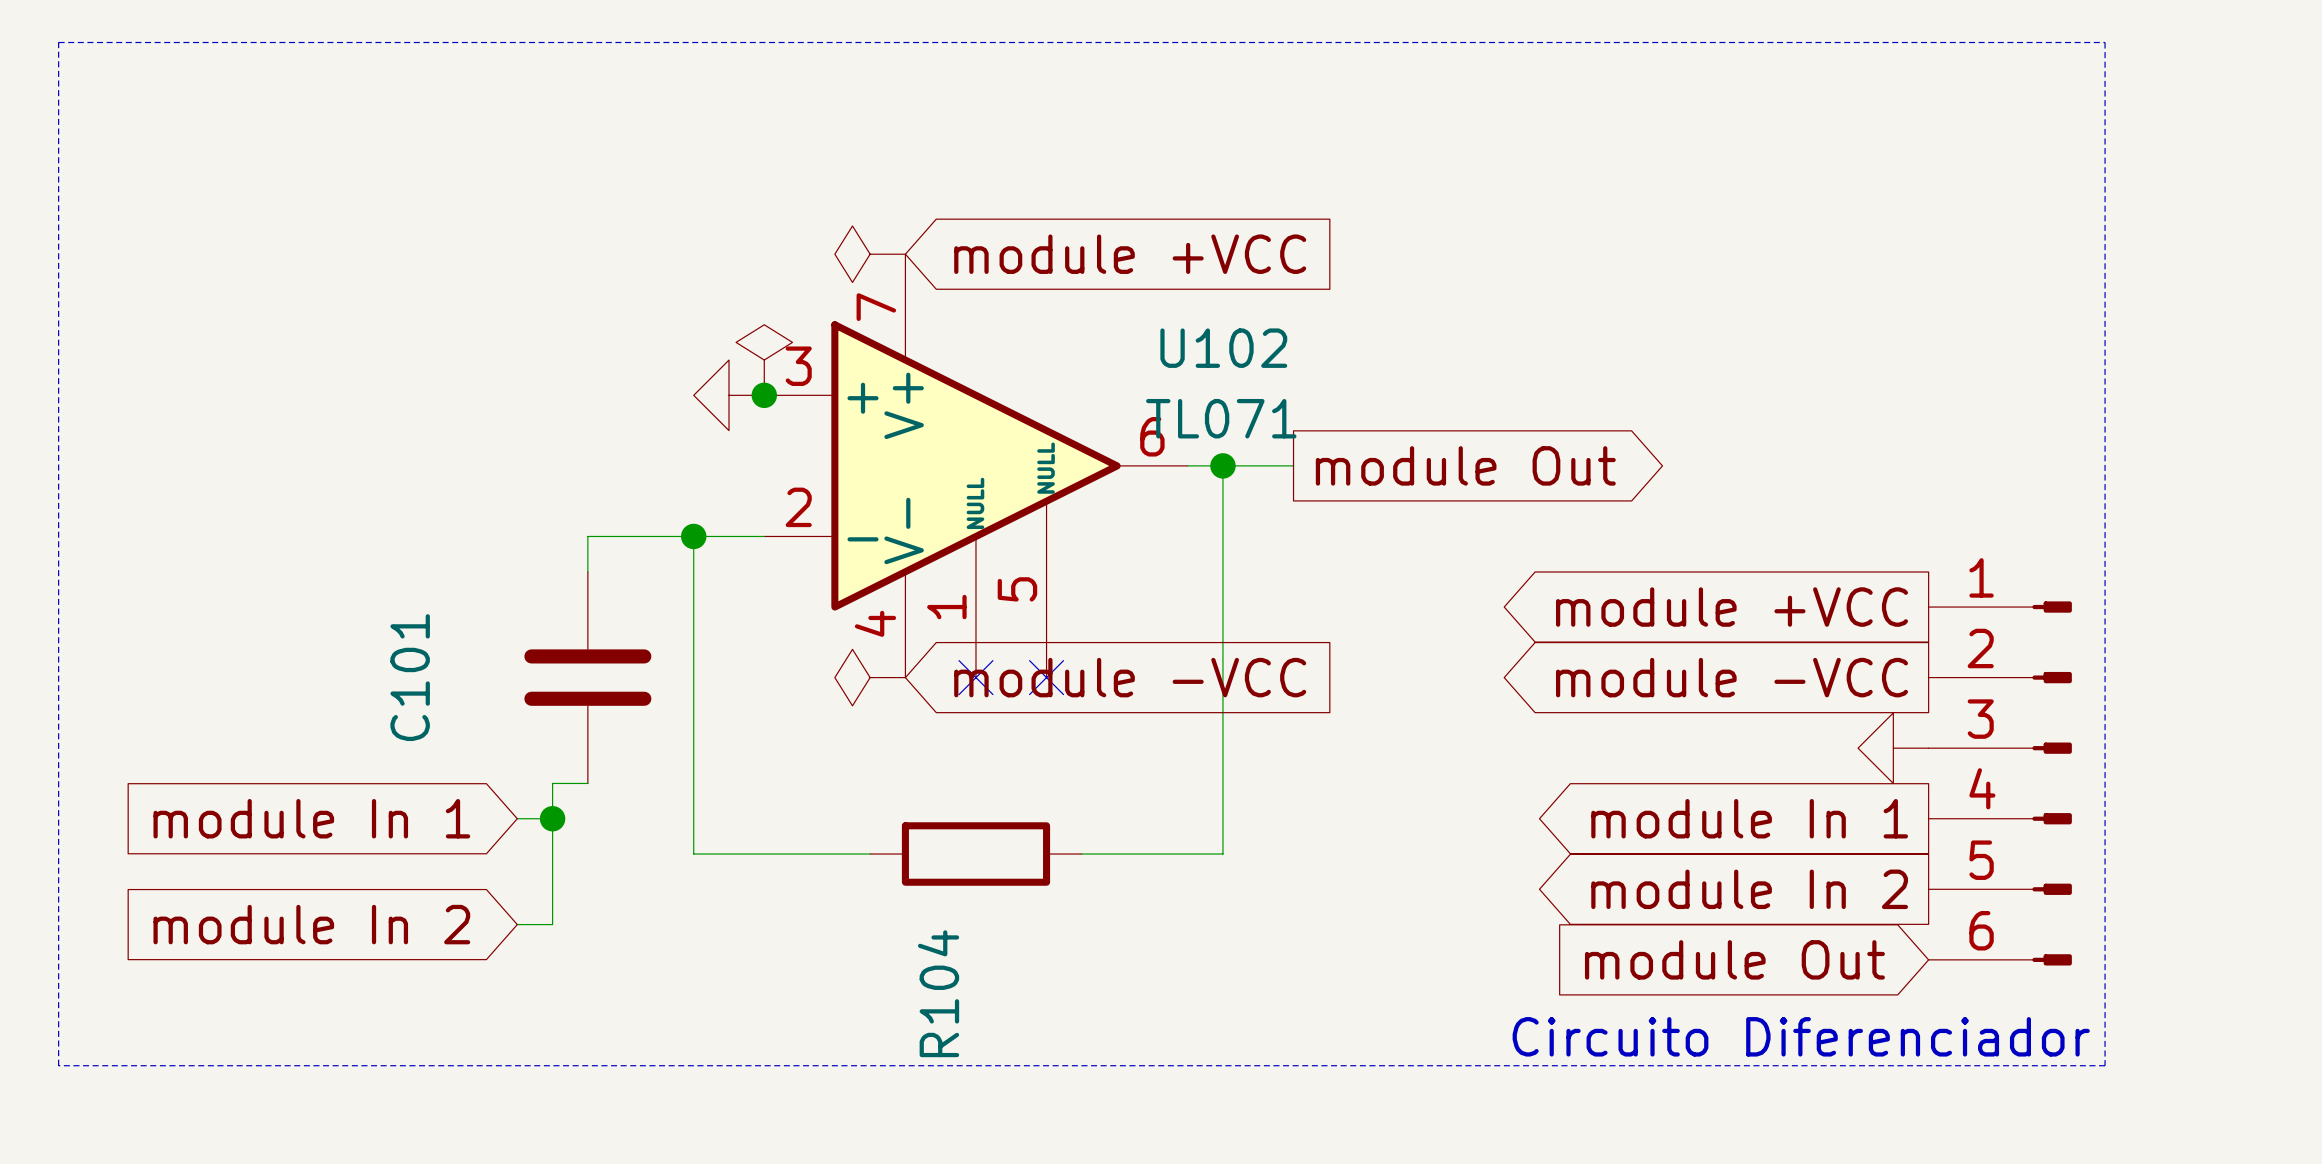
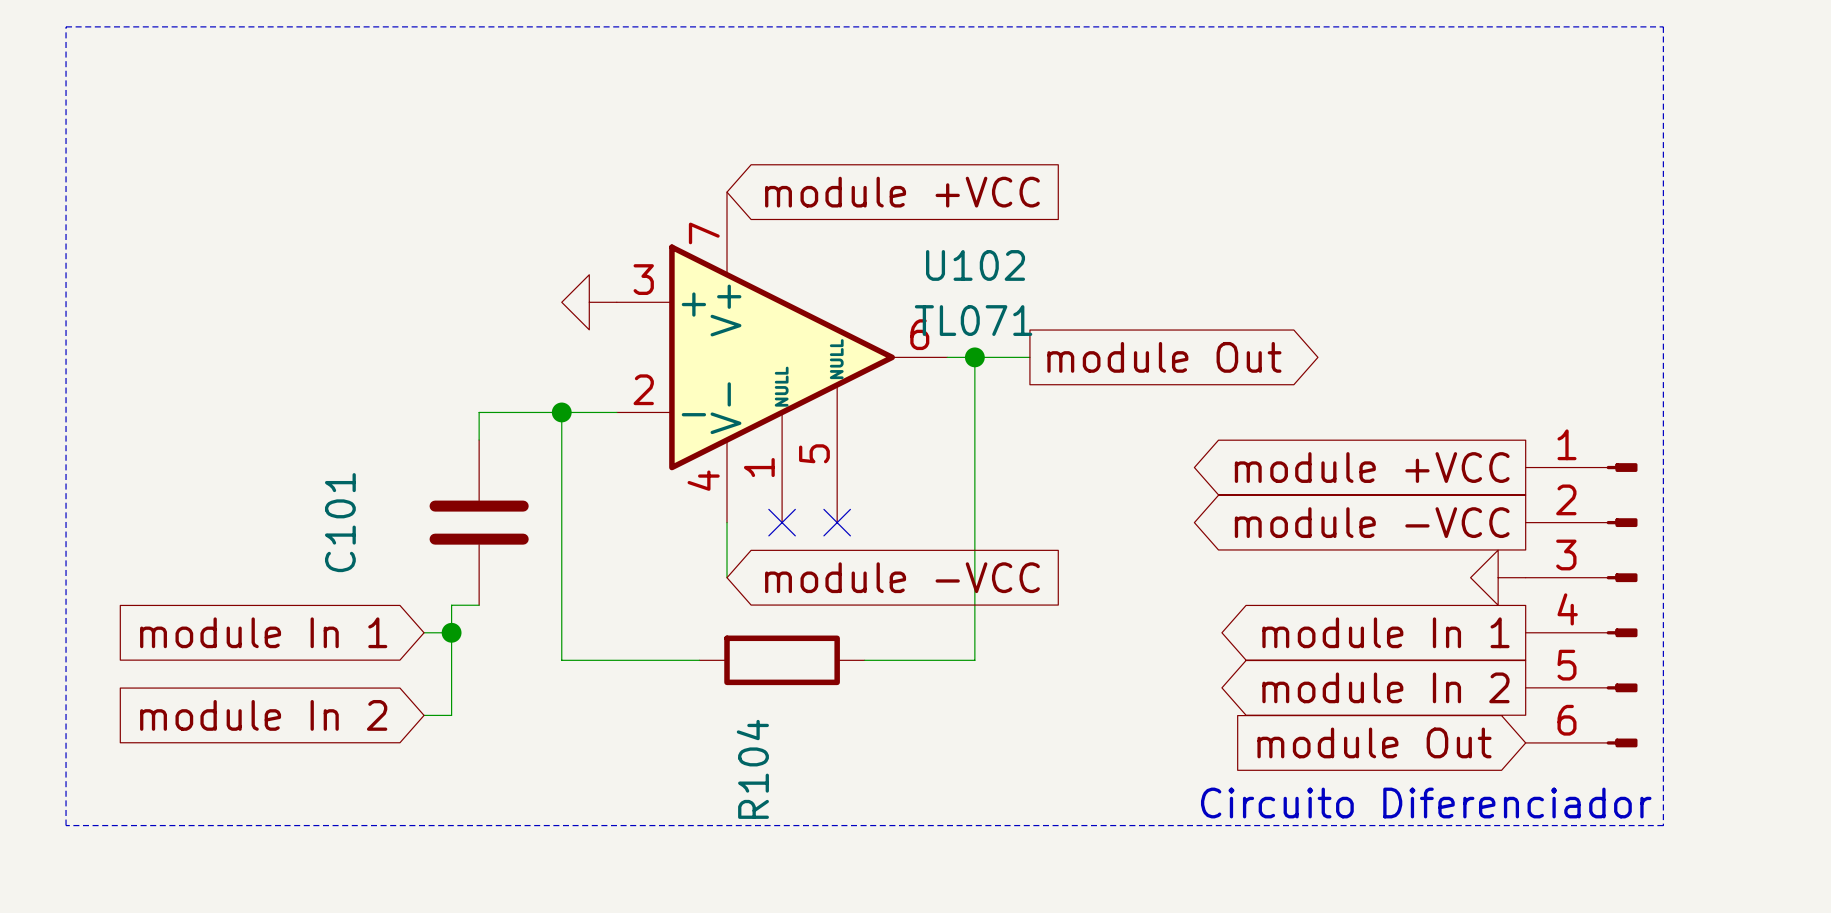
power symbol: (870, 254) -> none
power symbol: (764, 360) -> none
junction: (764, 395) -> none
power symbol: (870, 677) -> none
wire: none -> (727, 522) (727, 577)
global label position: module -VCC (1130, 677) -> module -VCC (902, 577)

